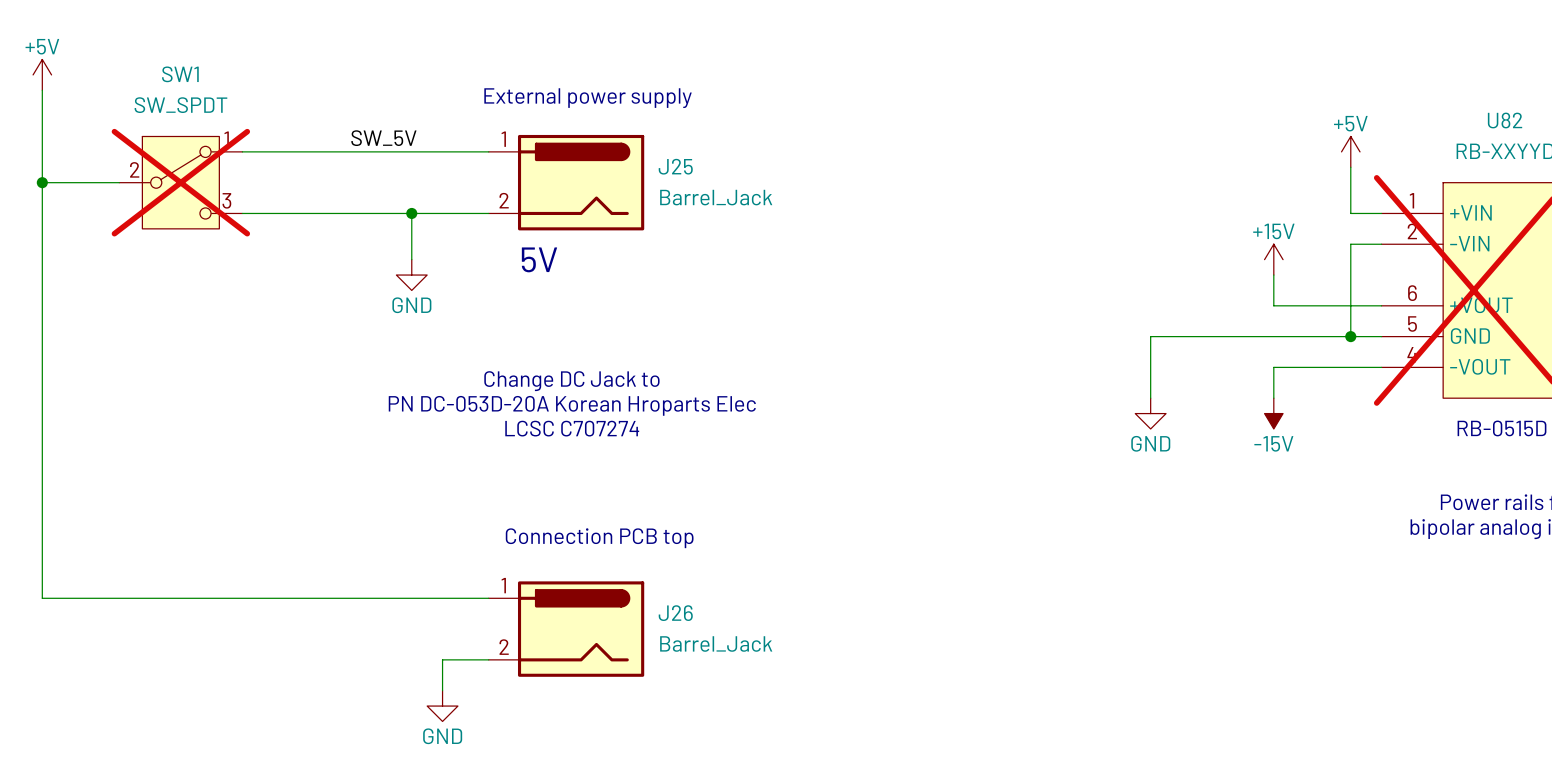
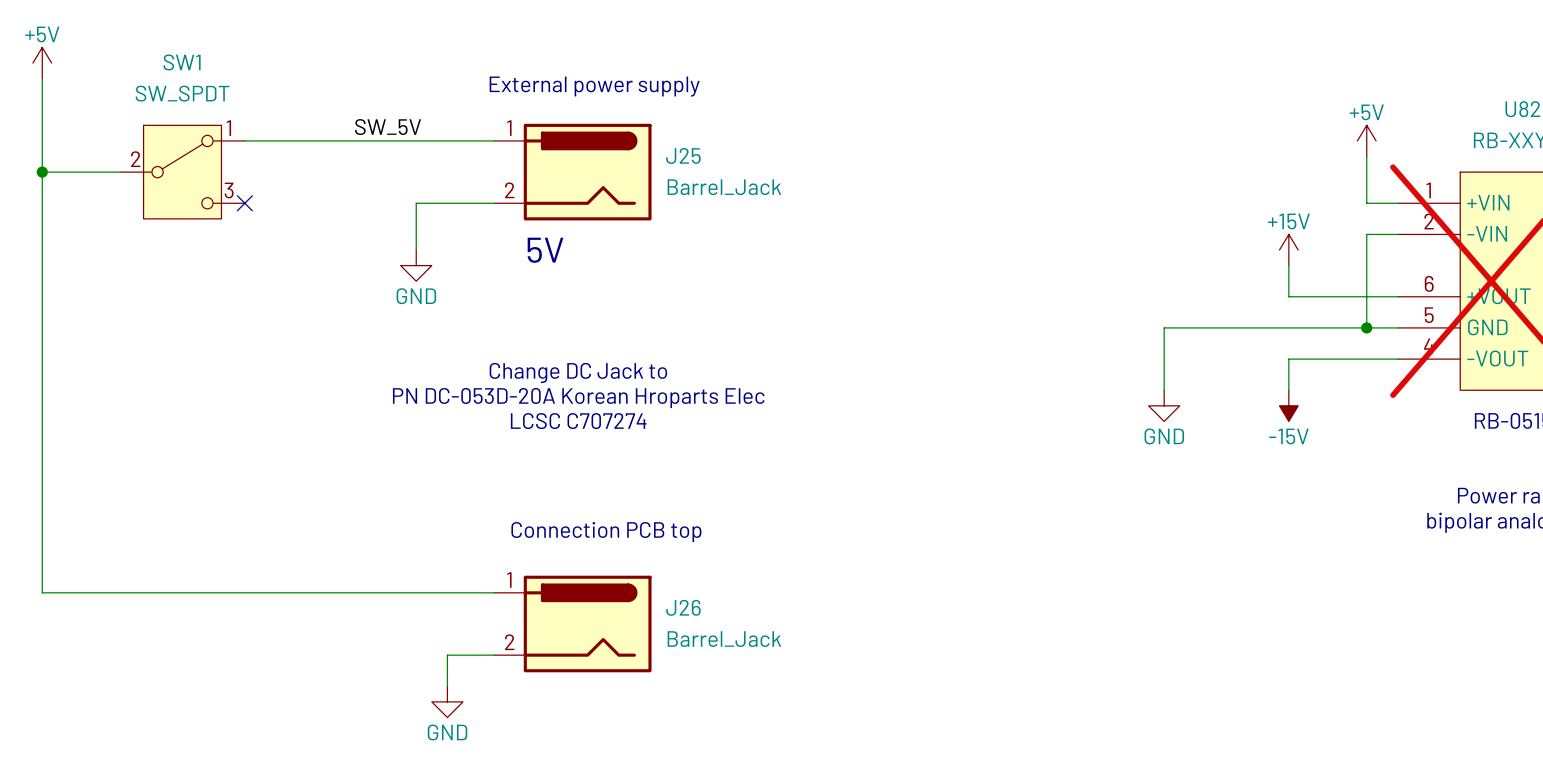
SW1 do-not-place cross: (180, 182) -> none
wire: (242, 213) (411, 213) -> none
no-connect mark: none -> (244, 203)
junction: (411, 213) -> none

